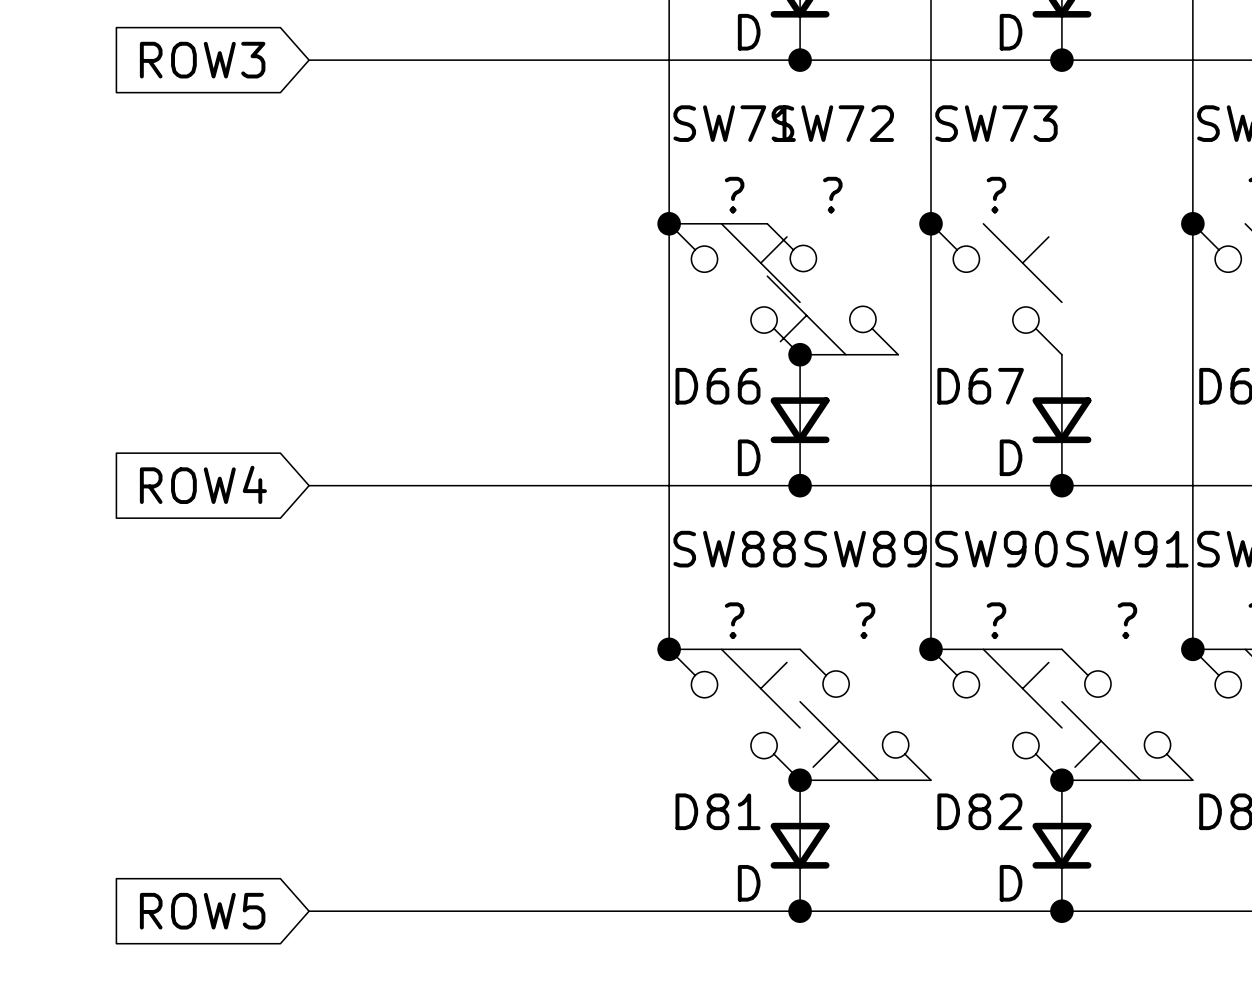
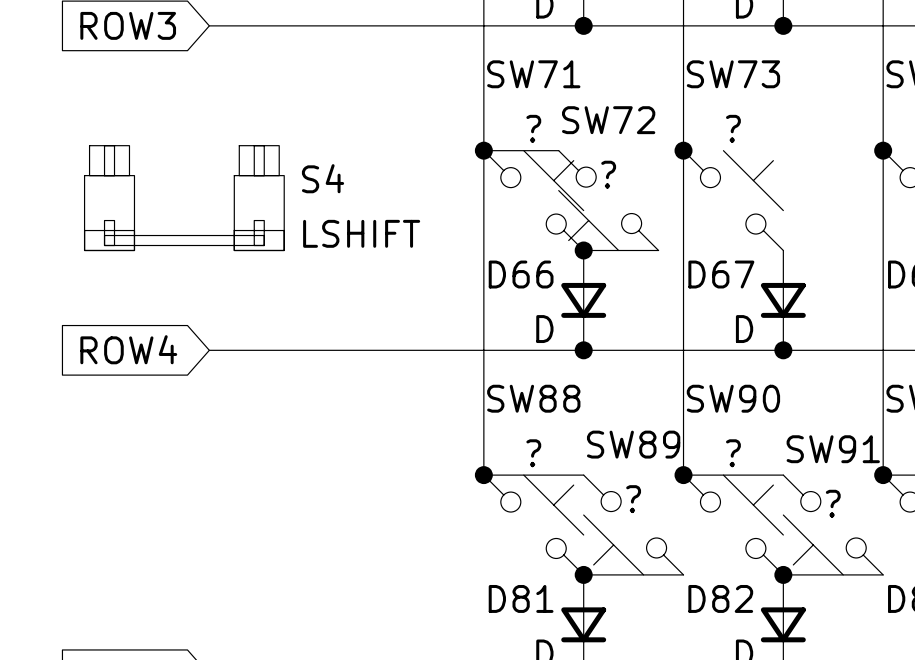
SW72 name position: SW72 (832, 123) -> SW72 (608, 120)
SW72 value position: ? (832, 195) -> ? (608, 174)
S4: none -> LSHIFT (184, 198)
SW89 name position: SW89 (865, 549) -> SW89 (633, 444)
SW91 name position: SW91 (1127, 549) -> SW91 (833, 449)
SW89 value position: ? (865, 620) -> ? (633, 499)
SW91 value position: ? (1127, 620) -> ? (833, 503)

